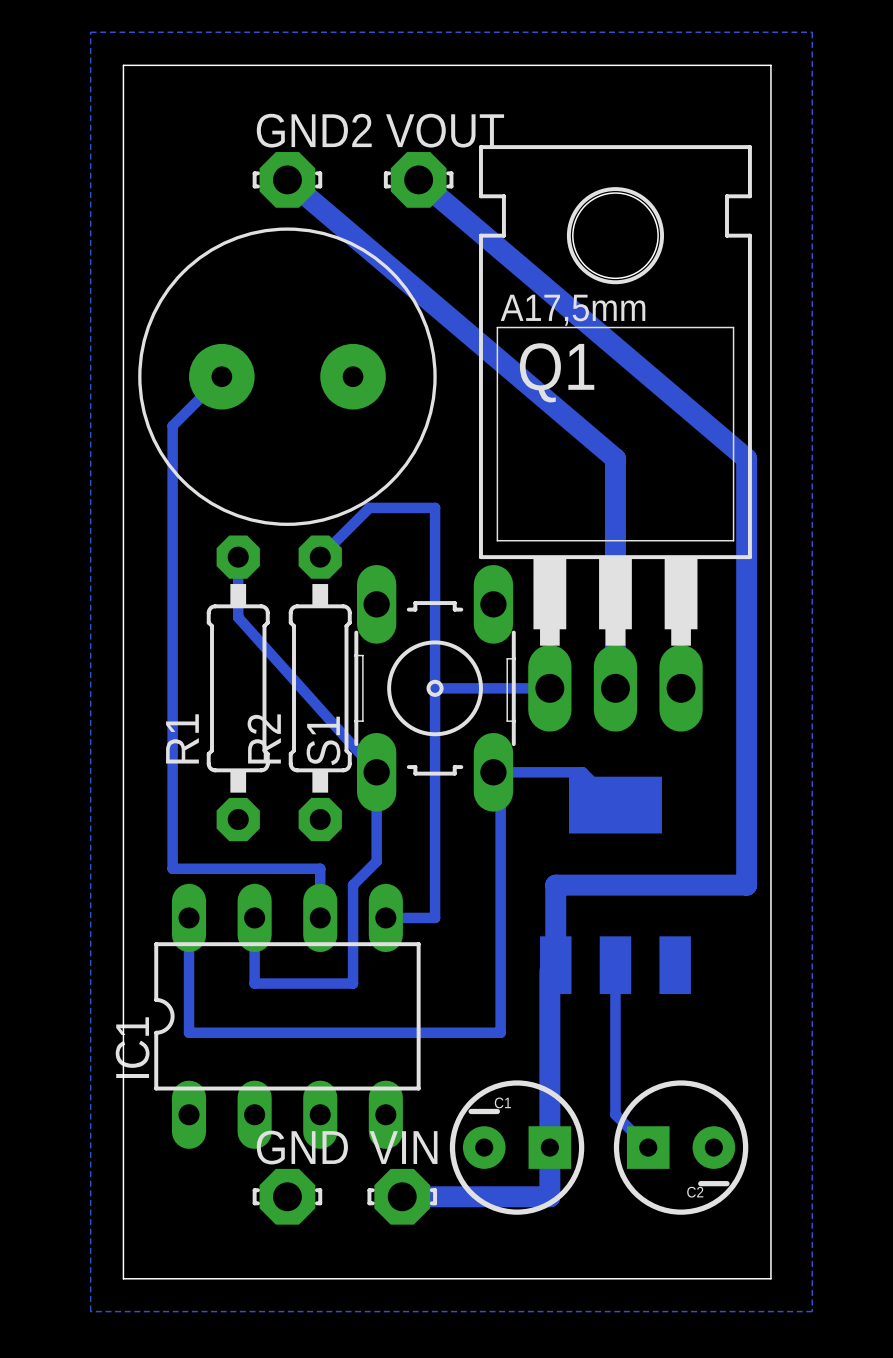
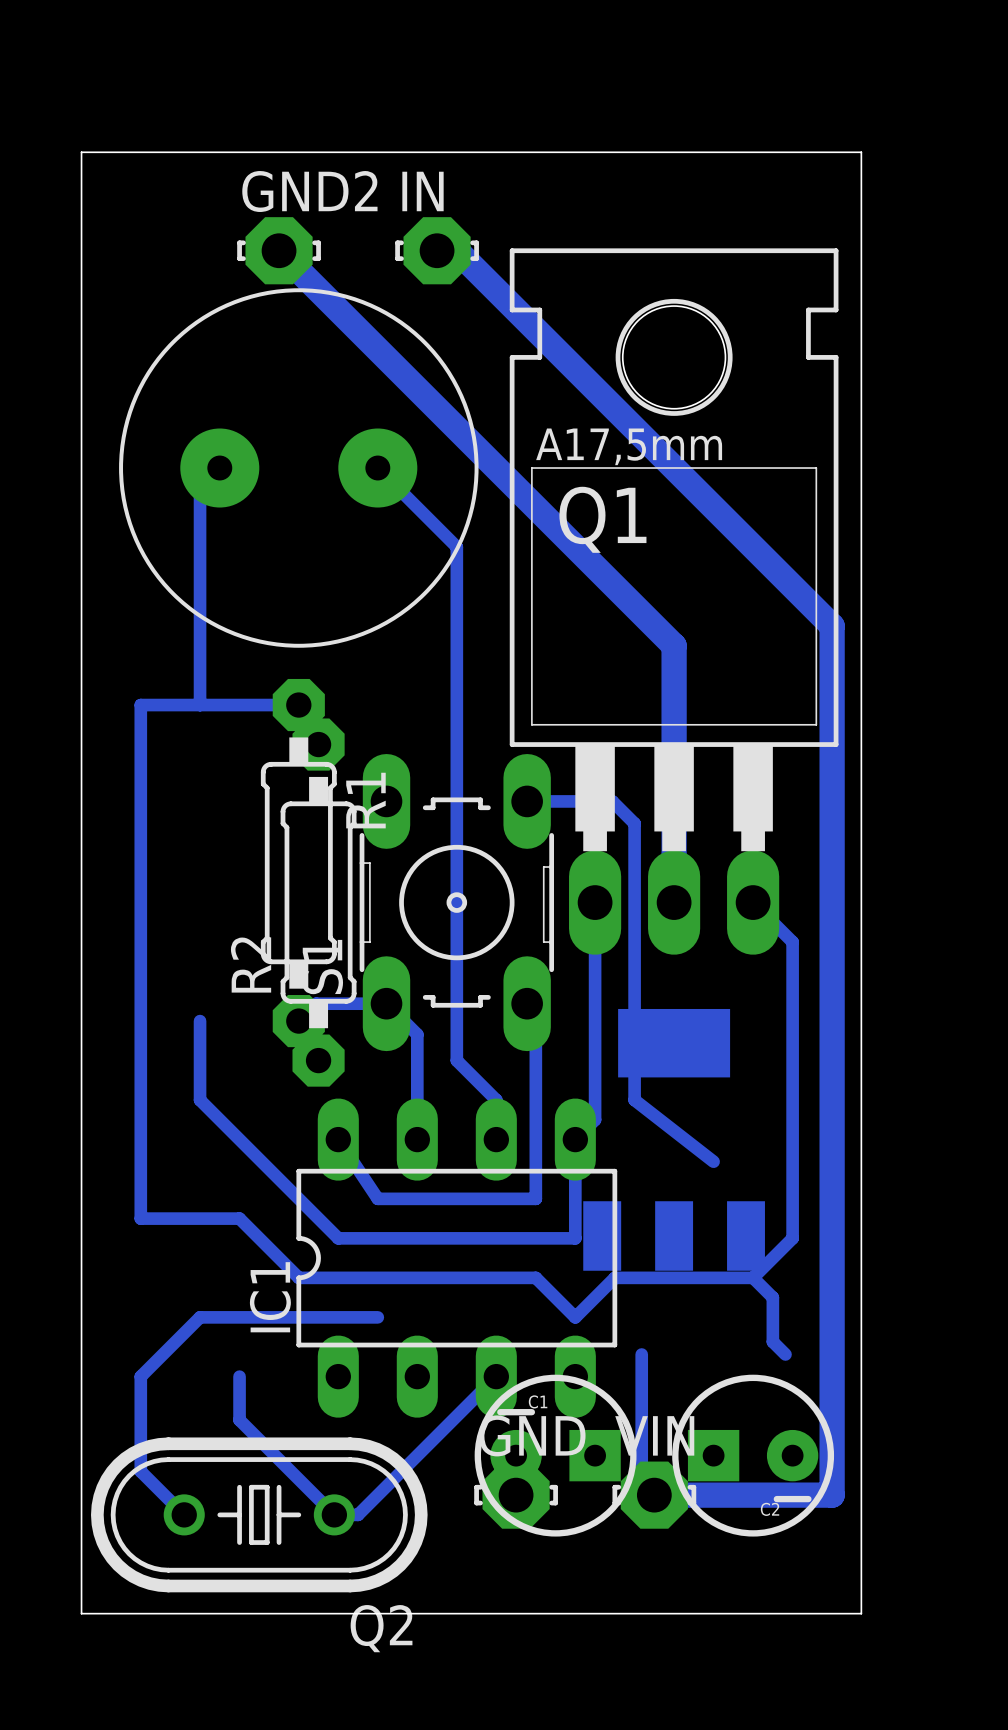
bottom zone outline: (90, 32) (812, 32) (812, 1311) (90, 1311) (90, 32) -> none
IN: none -> (437, 250)
bottom track: (287, 179) (615, 458) (615, 475) -> (279, 250) (674, 645)
GND2 position: (287, 179) -> (279, 250)
bottom track: (418, 179) (746, 458) -> (437, 250) (456, 250) (832, 626)
VOUT: (418, 179) -> none
bottom track: none -> (219, 468) (200, 487) (200, 705)
bottom track: (221, 376) (172, 425) (172, 524) -> (298, 705) (140, 705)
part position: (287, 376) -> (298, 468)
bottom track: (435, 507) (369, 507) (320, 557) -> (456, 685) (456, 547) (377, 468)
bottom track: (238, 557) (238, 617) (376, 772) (376, 861) (353, 885) (353, 983) (254, 983) (254, 917) -> none
bottom track: none -> (527, 801) (612, 801) (634, 823) (634, 1100) (713, 1161)
R1 position: (238, 688) -> (298, 863)
bottom track: (435, 688) (549, 688) -> (200, 1021) (200, 1100) (338, 1238) (575, 1238) (575, 1139) (595, 1119) (595, 902)
bottom track: none -> (753, 902) (792, 942) (792, 1238) (753, 1277)
R1 name position: R1 (182, 738) -> R1 (365, 800)
bottom track: (493, 772) (582, 772) (615, 805) -> none
bottom track: none -> (298, 1021) (316, 1003) (386, 1003) (417, 1034) (417, 1139)
bottom track: (435, 819) (435, 917) (385, 917) -> (456, 1060) (496, 1100) (496, 1139)
bottom track: (172, 868) (320, 868) (320, 917) -> (140, 1119) (140, 1218) (239, 1218) (298, 1277) (535, 1277) (575, 1317) (614, 1277) (753, 1277)
bottom track: (746, 885) (555, 885) (555, 965) (549, 971) (549, 1196) (402, 1196) -> (832, 1139) (832, 1495) (654, 1495) (641, 1482) (641, 1354)
bottom track: (189, 917) (189, 1032) (221, 1032) -> (184, 1514) (140, 1471) (140, 1376) (200, 1317)
bottom track: (500, 934) (500, 1032) (369, 1032) -> (535, 1198) (377, 1198) (338, 1139)
bottom track: (615, 965) (615, 1114) (648, 1147) -> none
bottom track: none -> (753, 1277) (772, 1297) (772, 1341) (785, 1354)
IC1 position: (287, 1016) -> (456, 1258)
bottom track: none -> (239, 1376) (239, 1420) (334, 1514) (358, 1514) (496, 1376)
Q2: none -> (259, 1514)
GND position: (287, 1196) -> (516, 1495)
VIN position: (402, 1196) -> (654, 1495)

